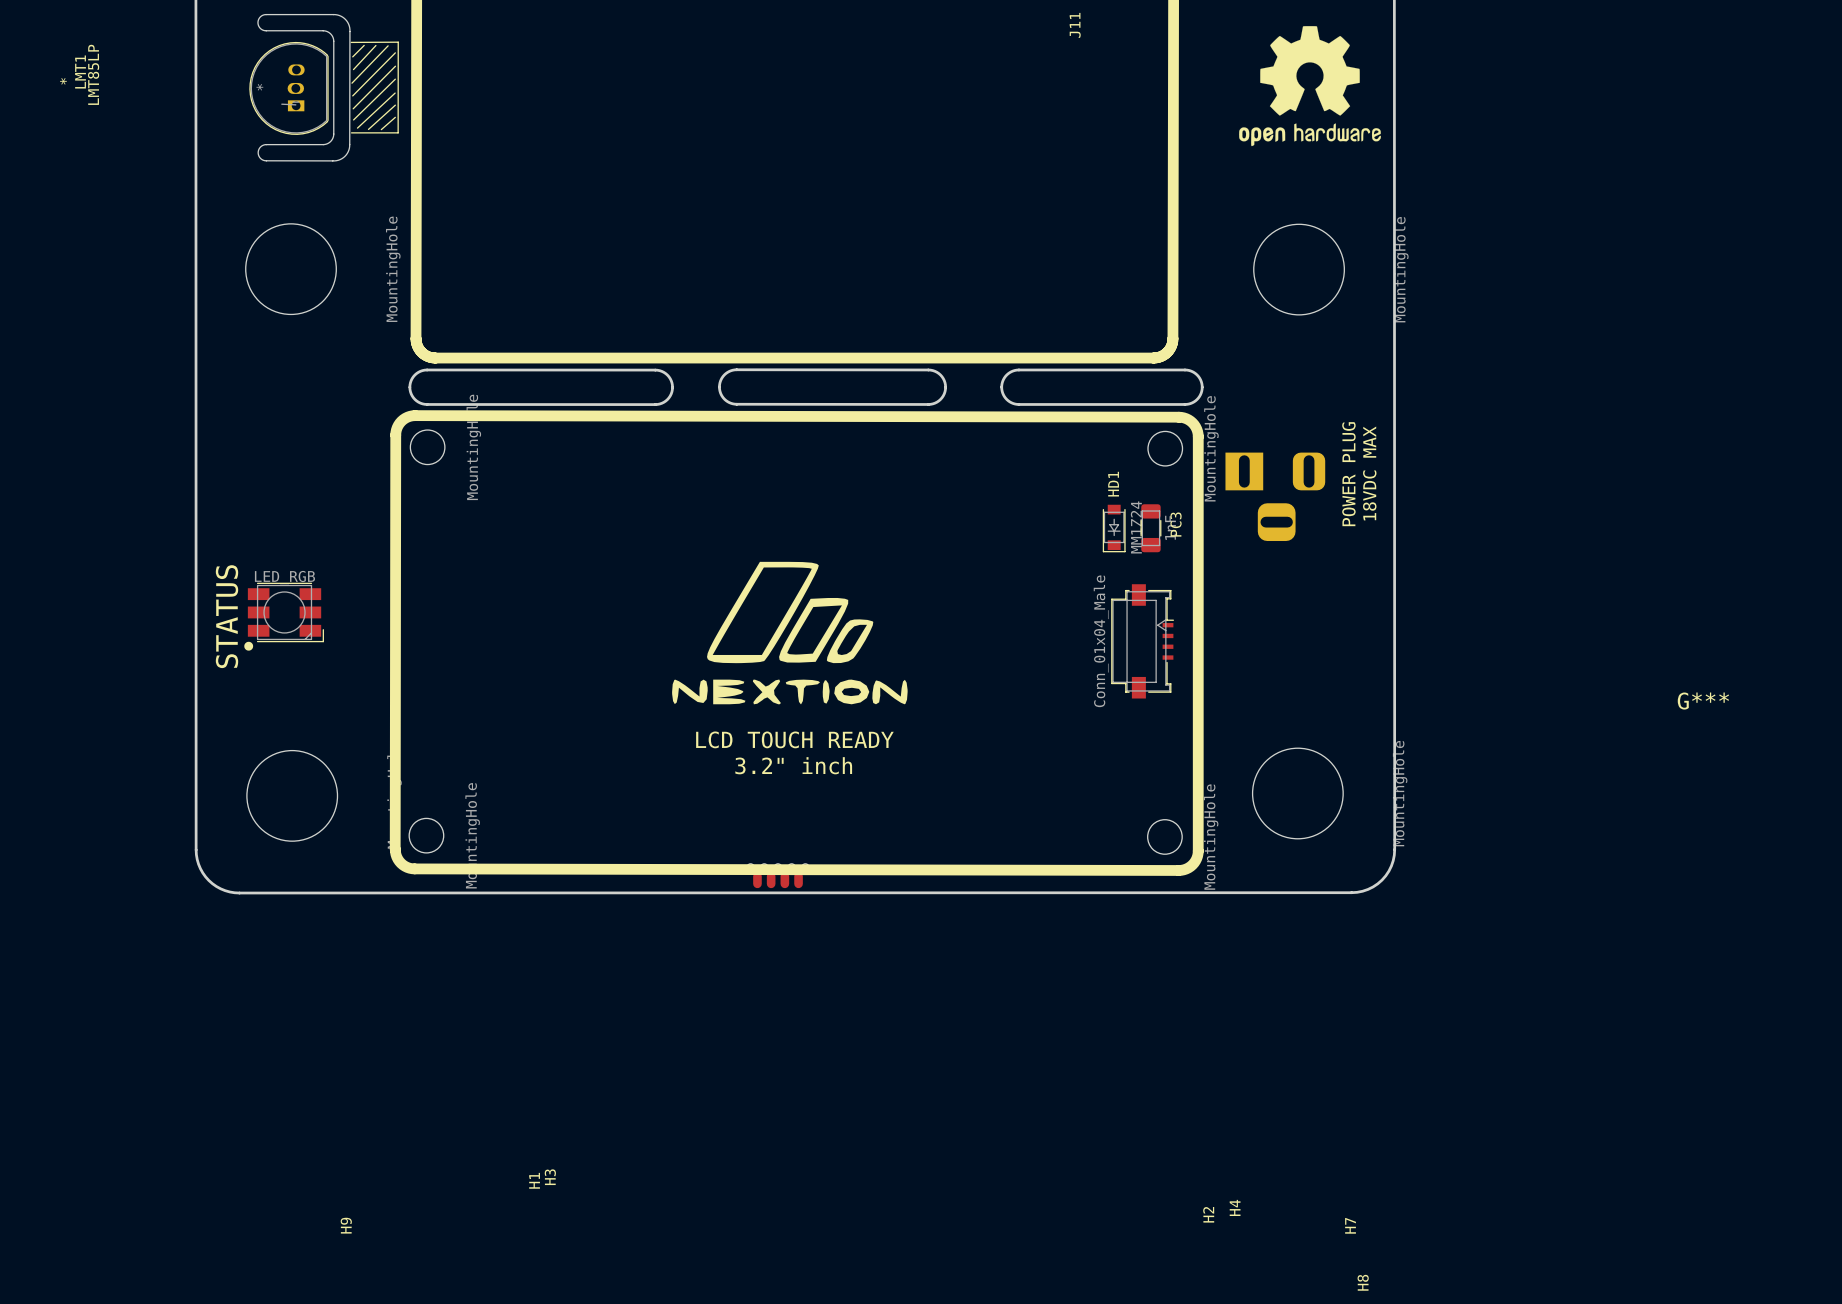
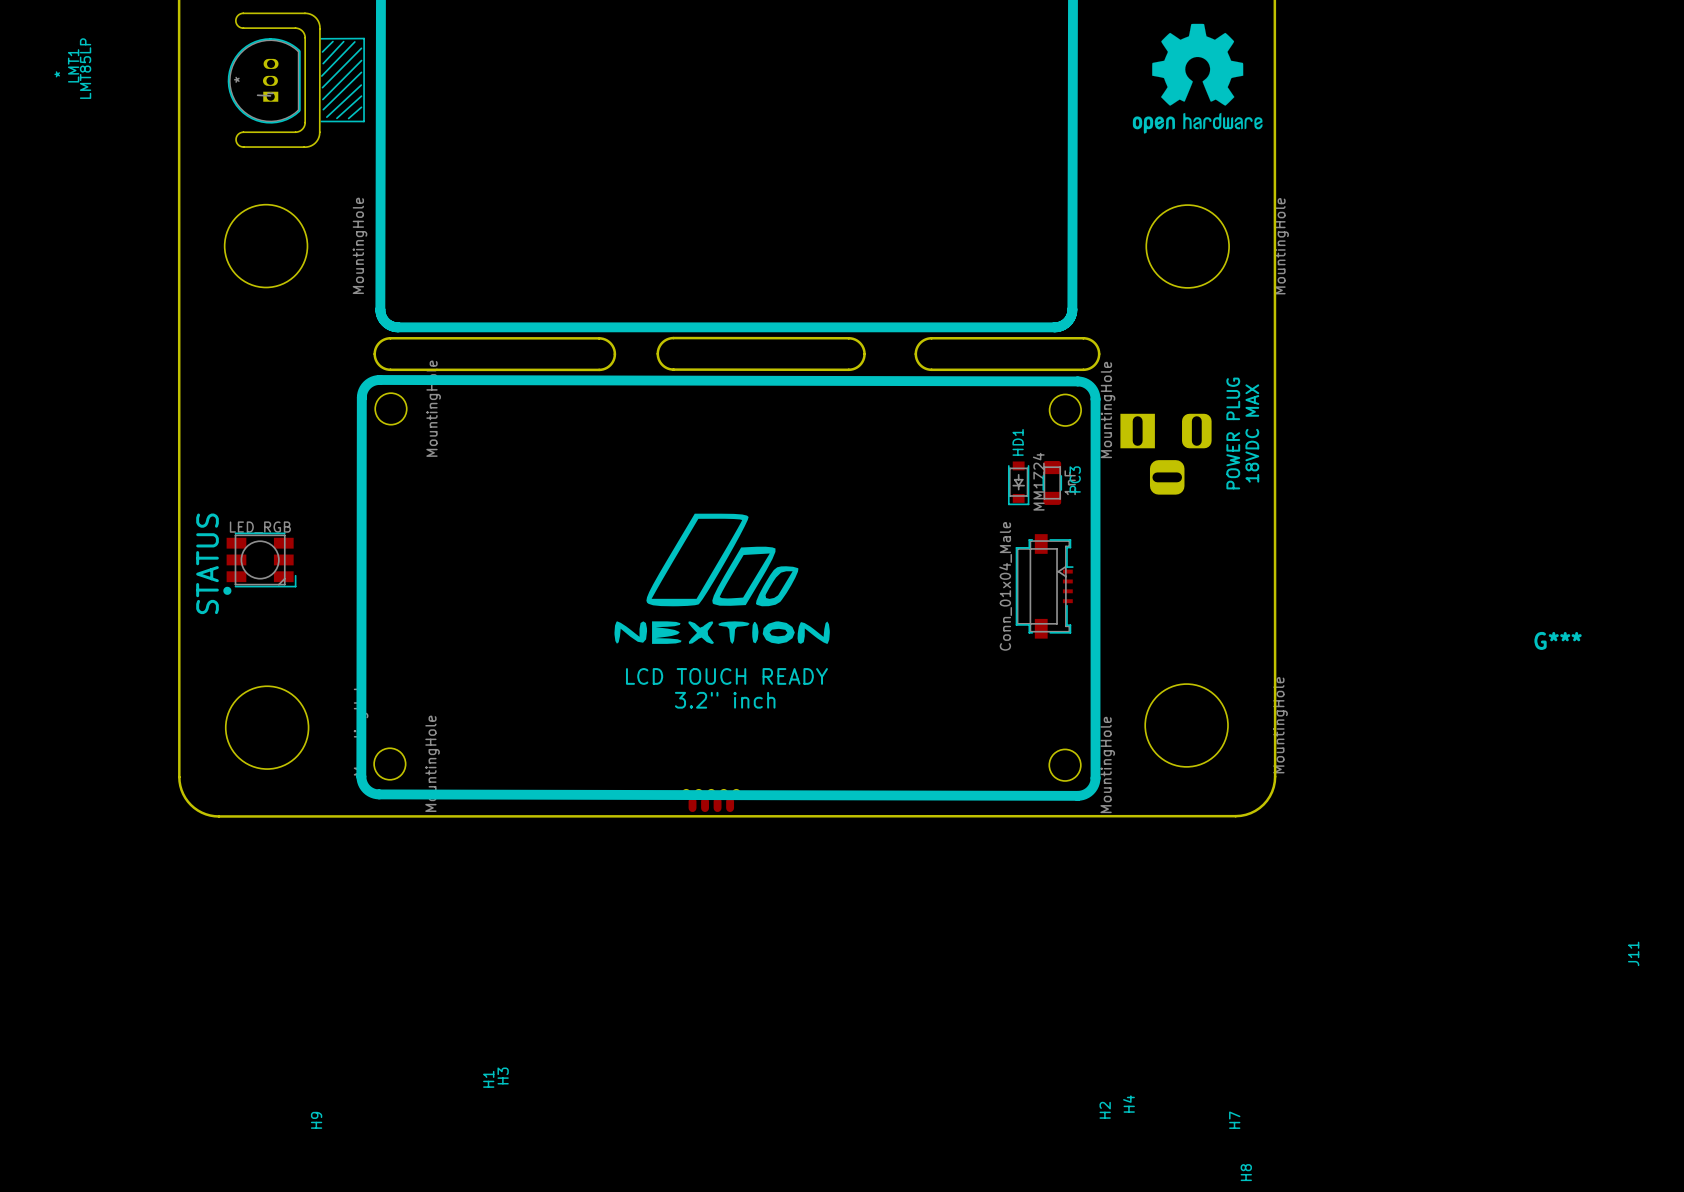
J11 name position: J11 (1075, 25) -> J11 (1633, 953)

